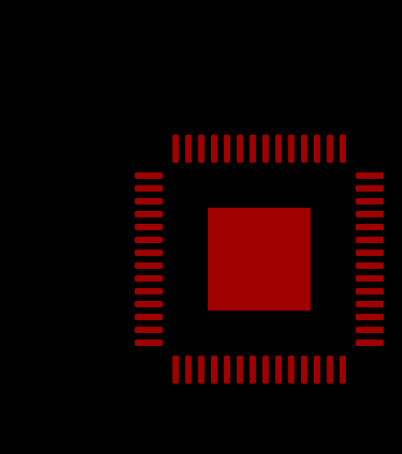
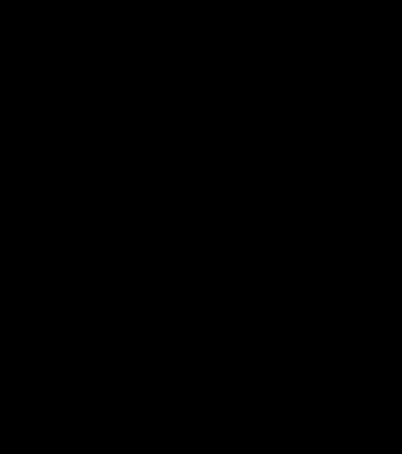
part: (259, 259) -> none

